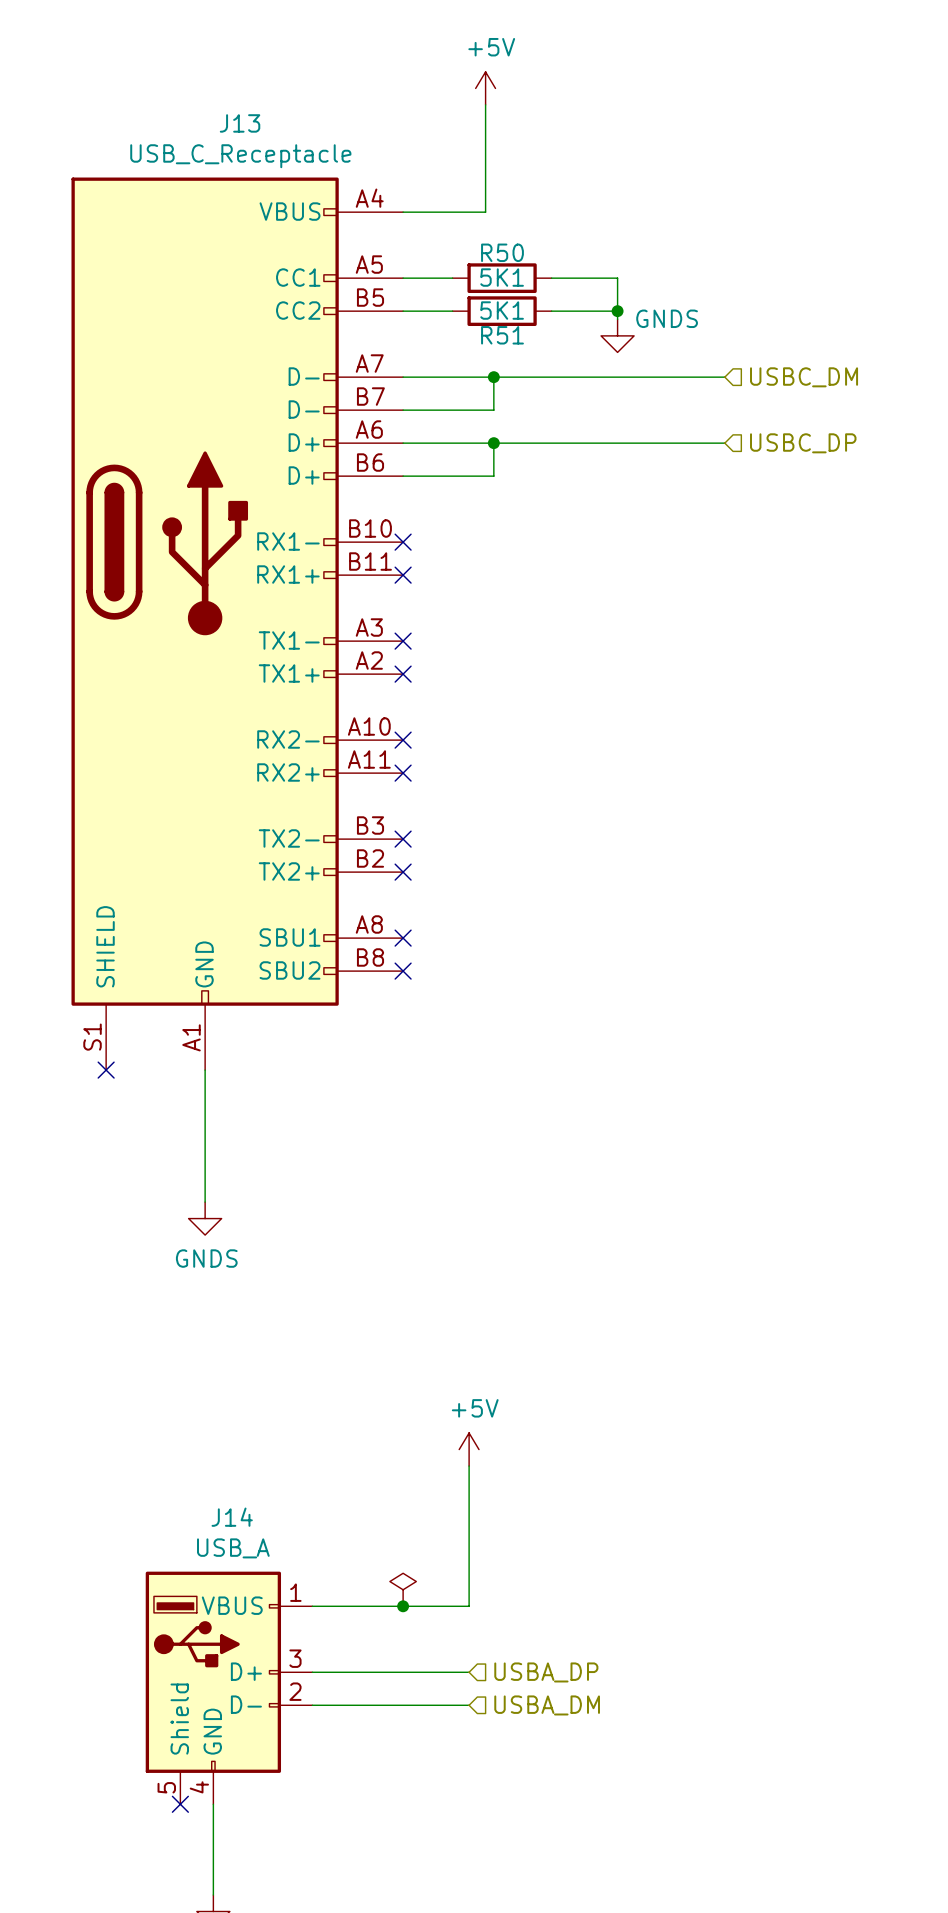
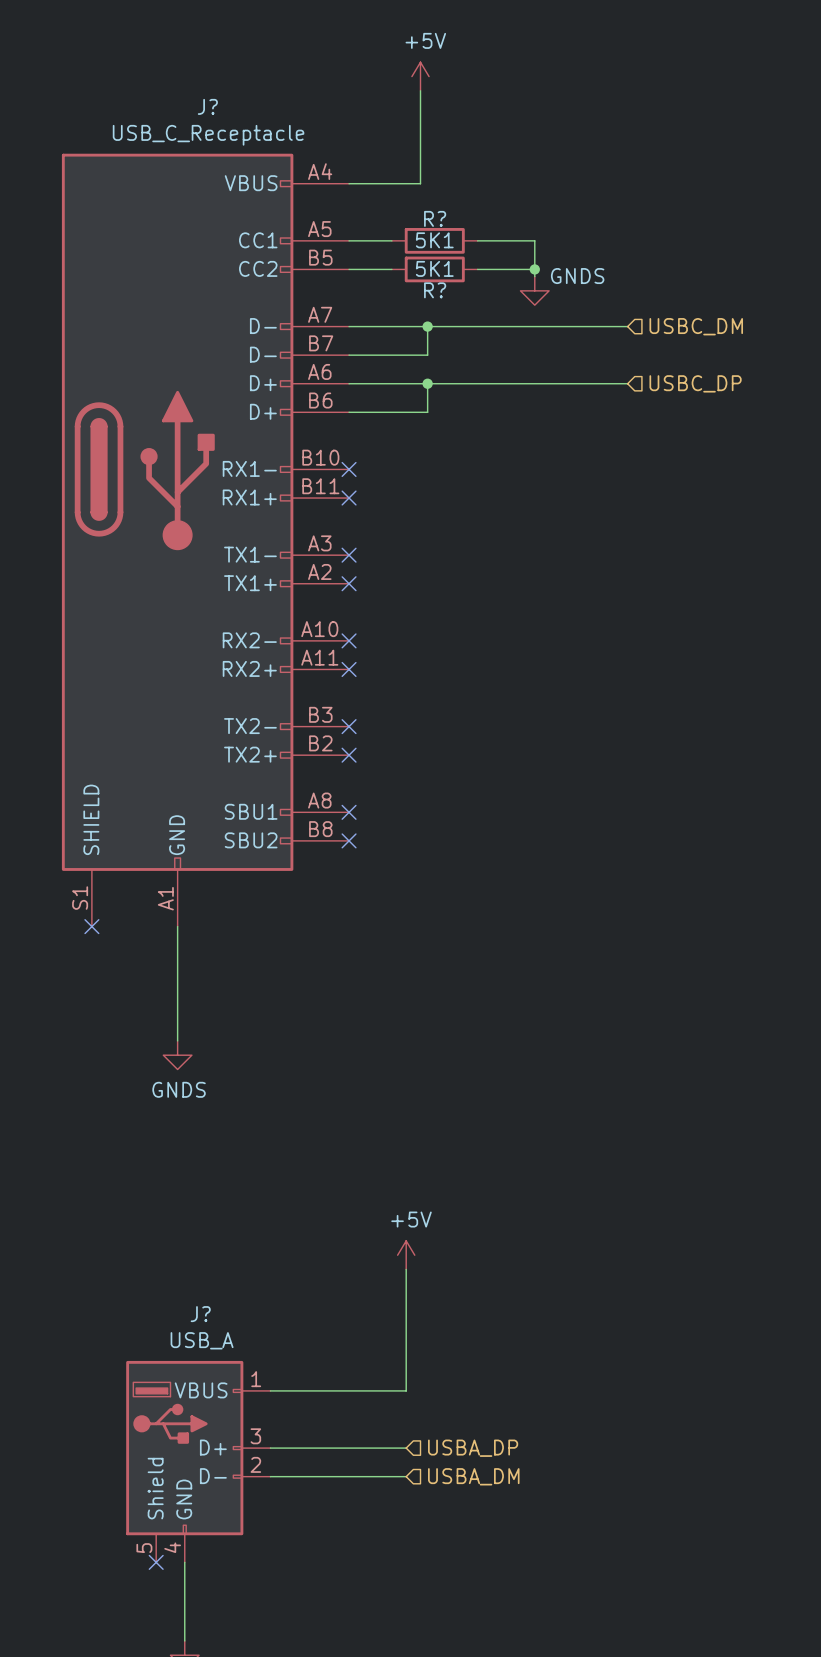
J13 name: J13 (240, 123) -> J? (207, 106)
R50 name: R50 (502, 252) -> R? (435, 218)
R51 name: R51 (502, 335) -> R? (435, 290)
J14 name: J14 (232, 1517) -> J? (200, 1314)
power symbol: (403, 1589) -> none
junction: (403, 1606) -> none

